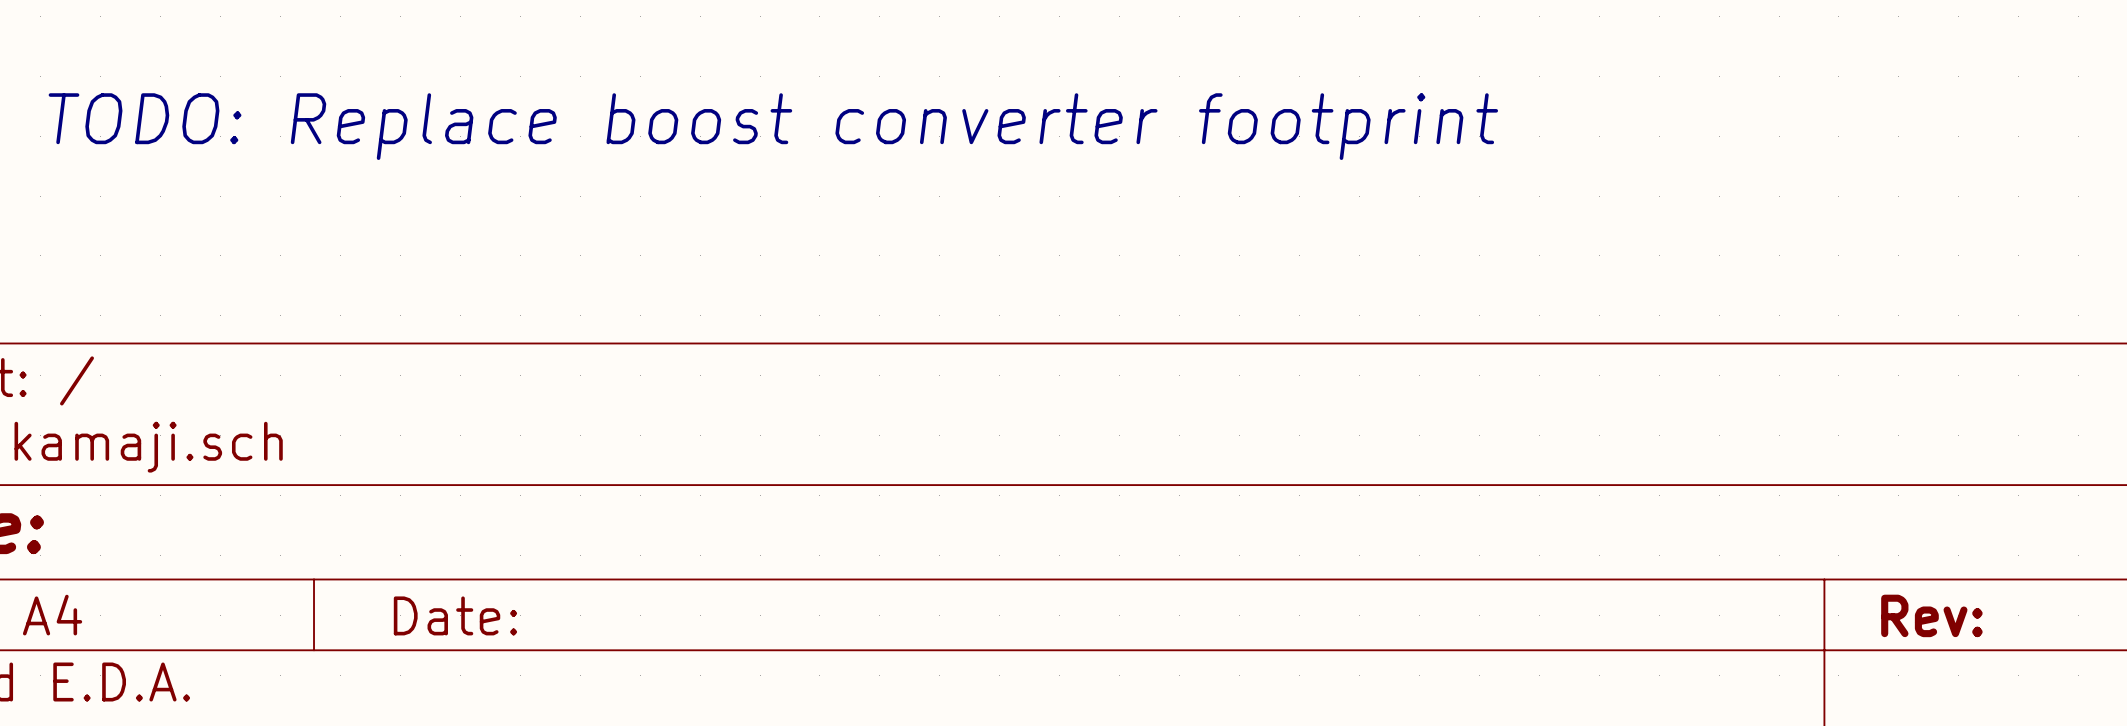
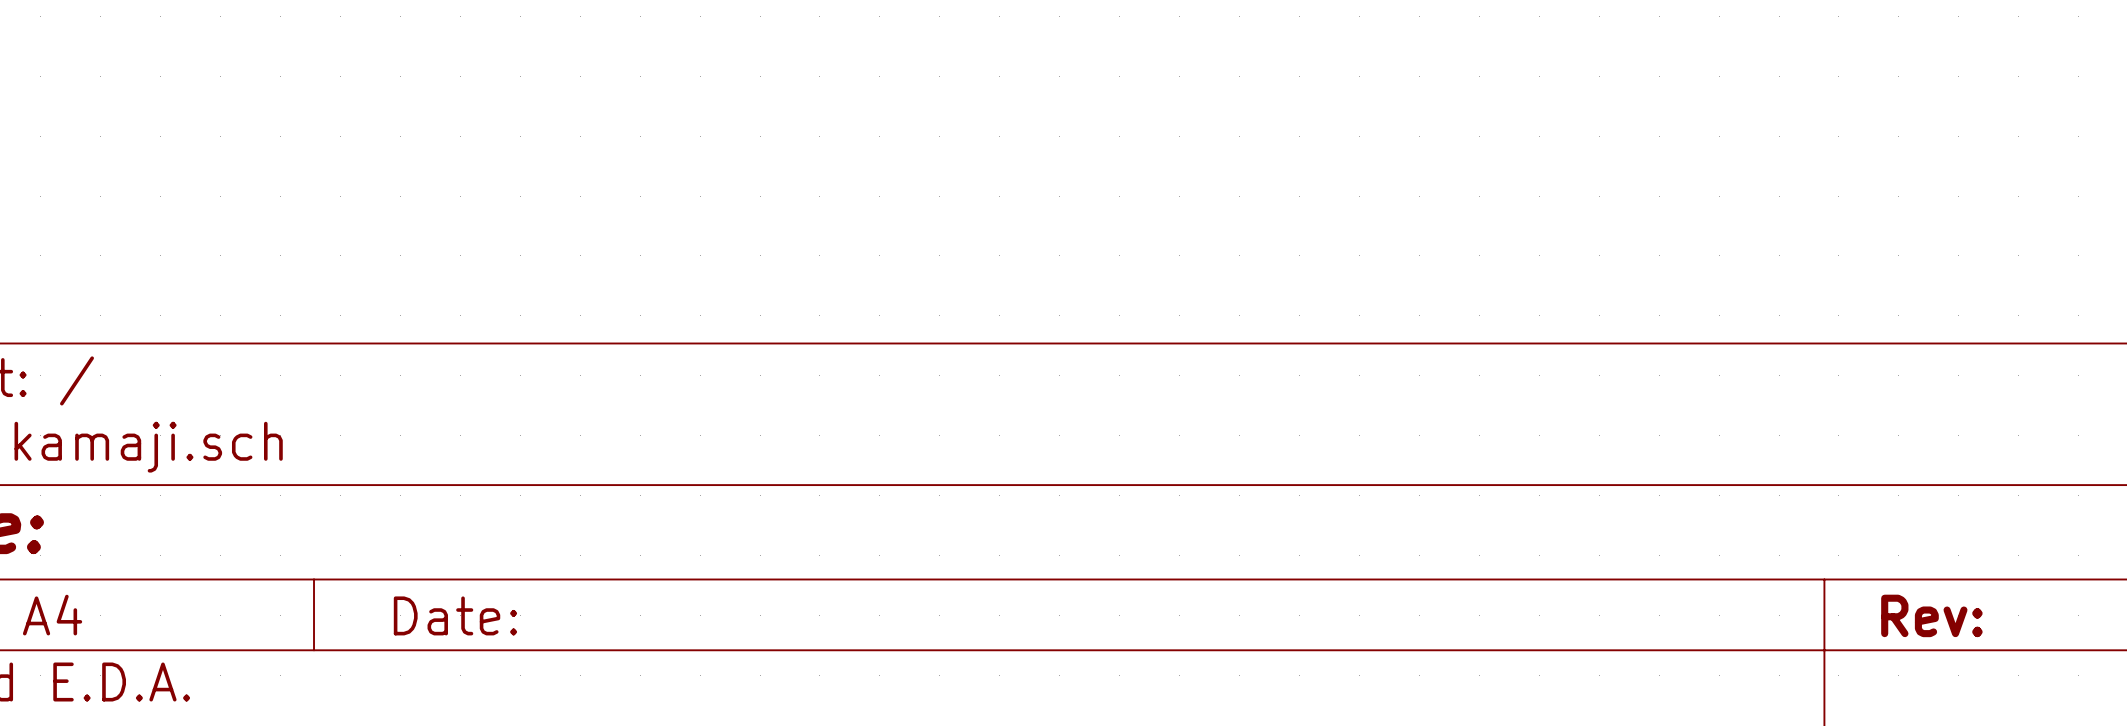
text: TODO: Replace boost converter footprint (773, 126) -> none

